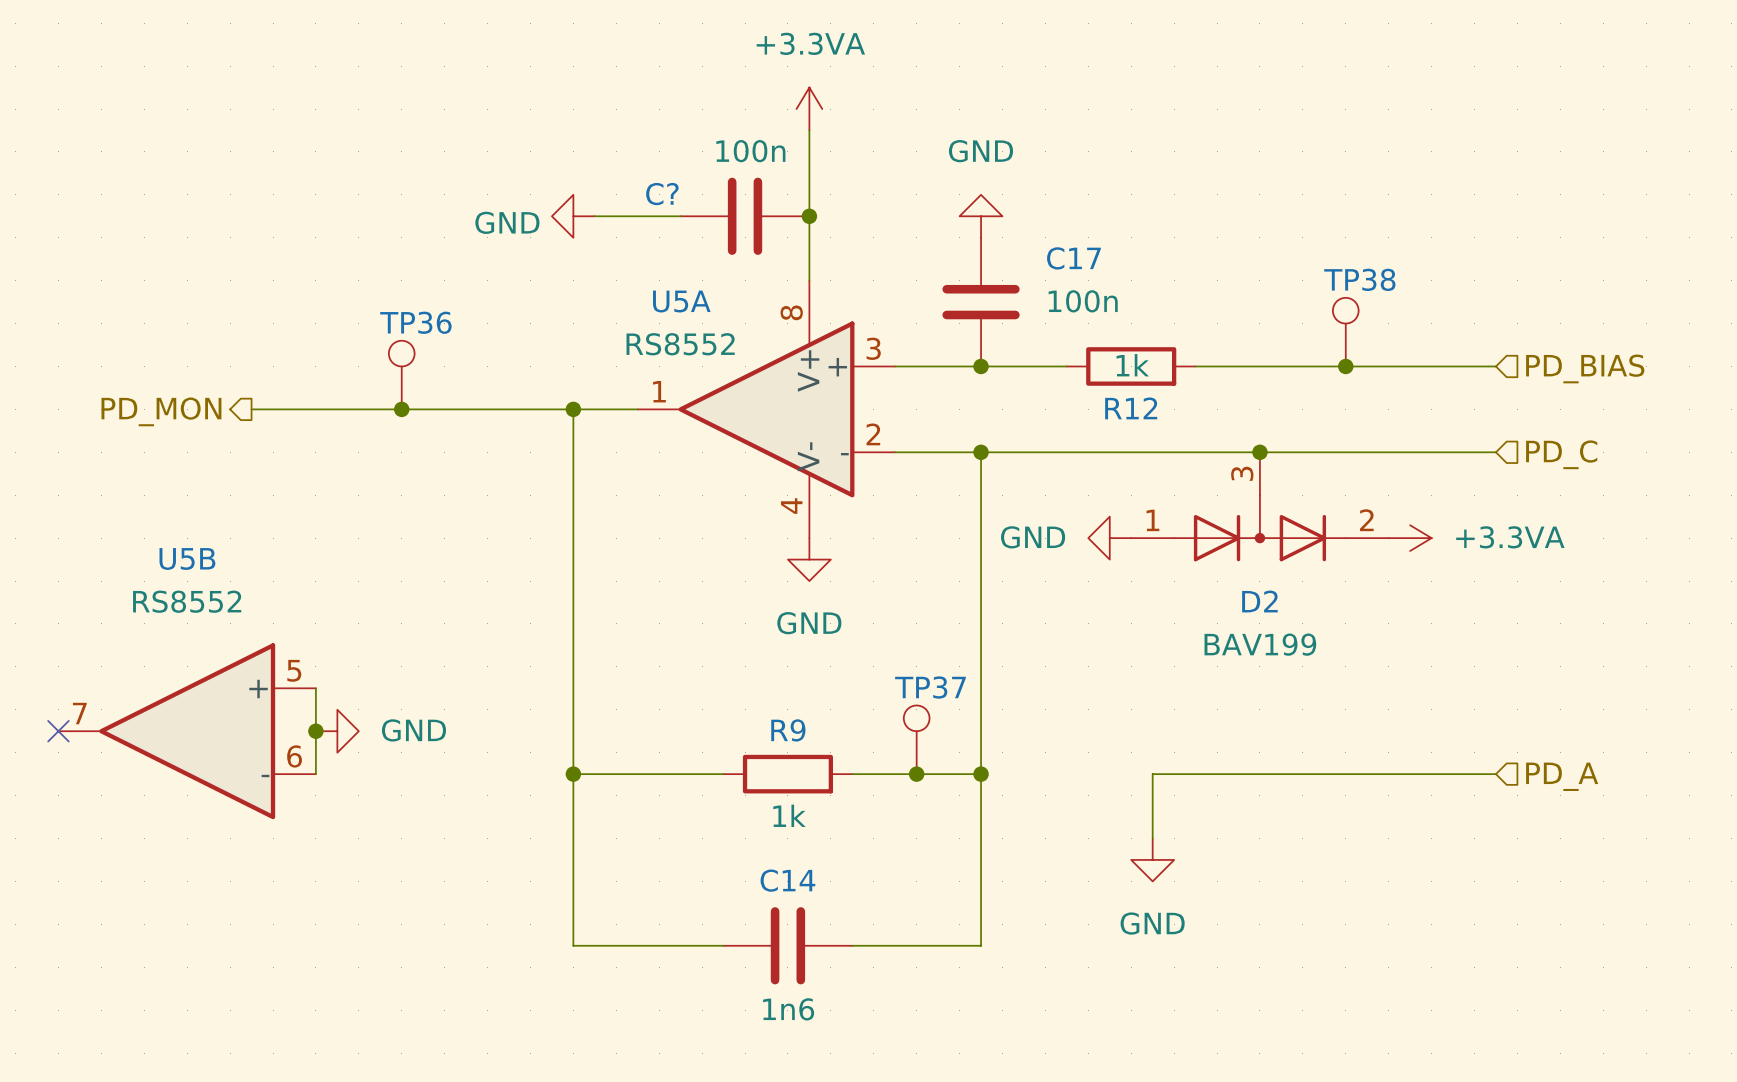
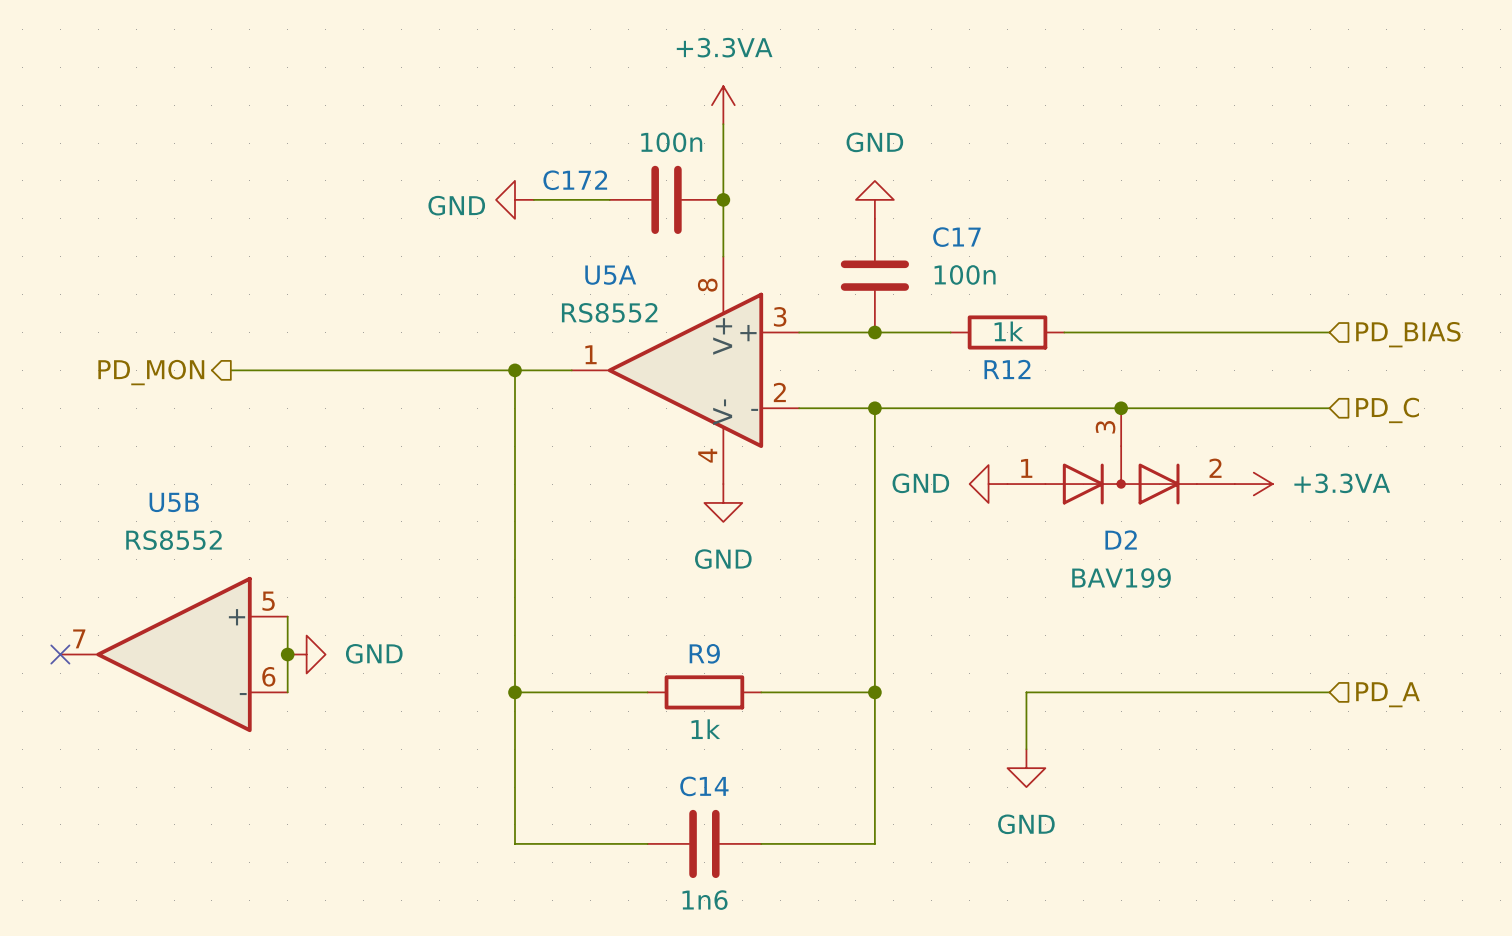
C? name: C? (662, 194) -> C172 (575, 180)
TP38: (1345, 332) -> none
junction: (1345, 366) -> none
TP36: (401, 375) -> none
junction: (401, 409) -> none
TP37: (916, 739) -> none
junction: (916, 774) -> none

